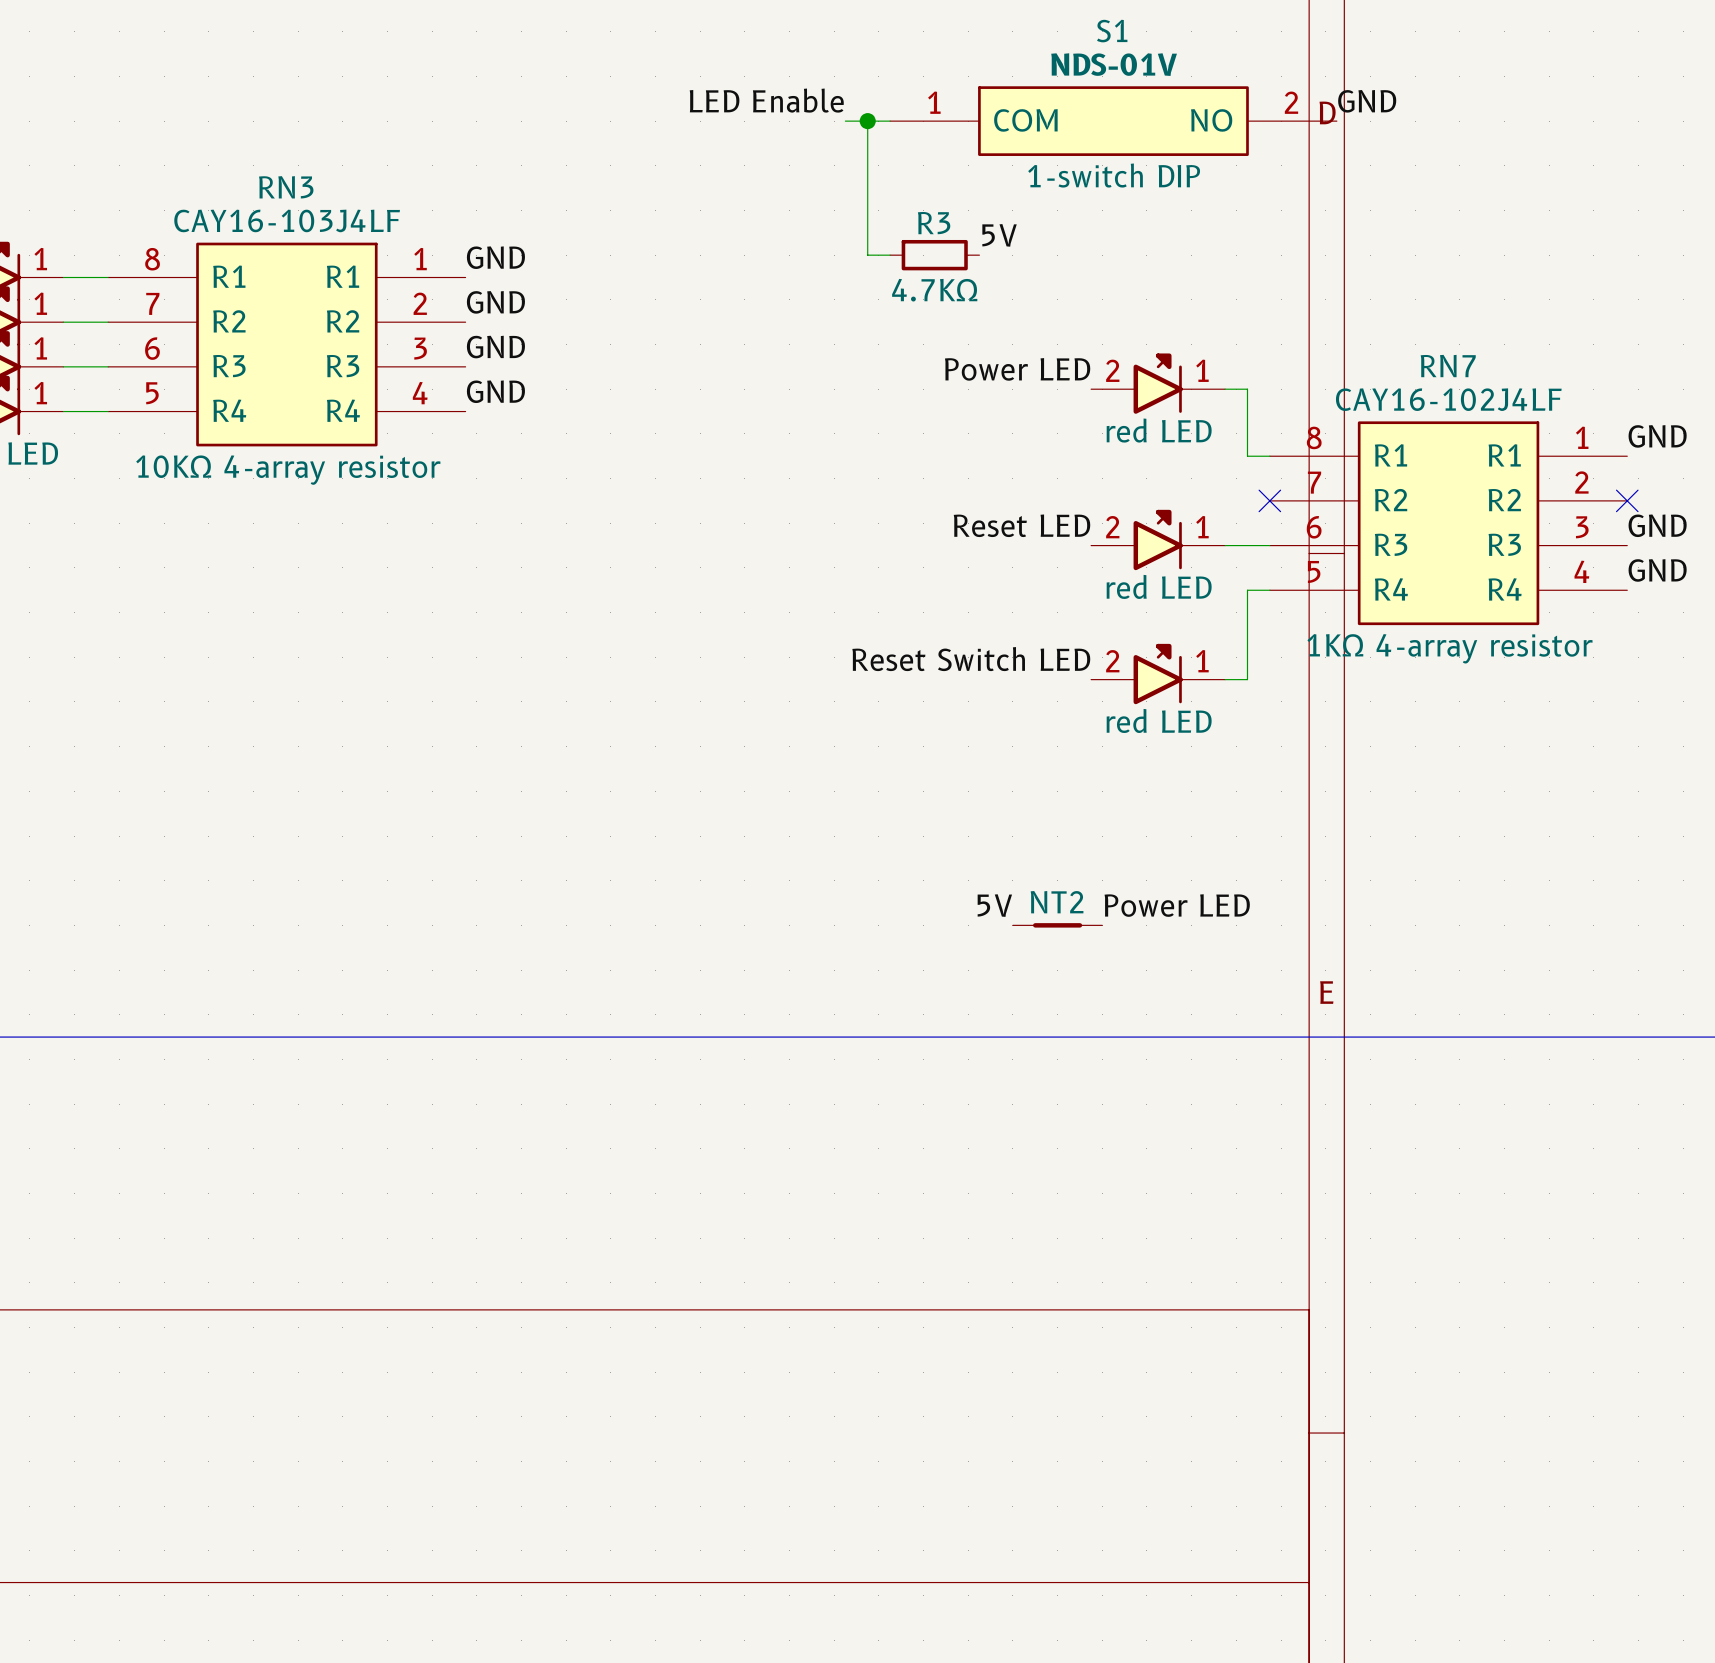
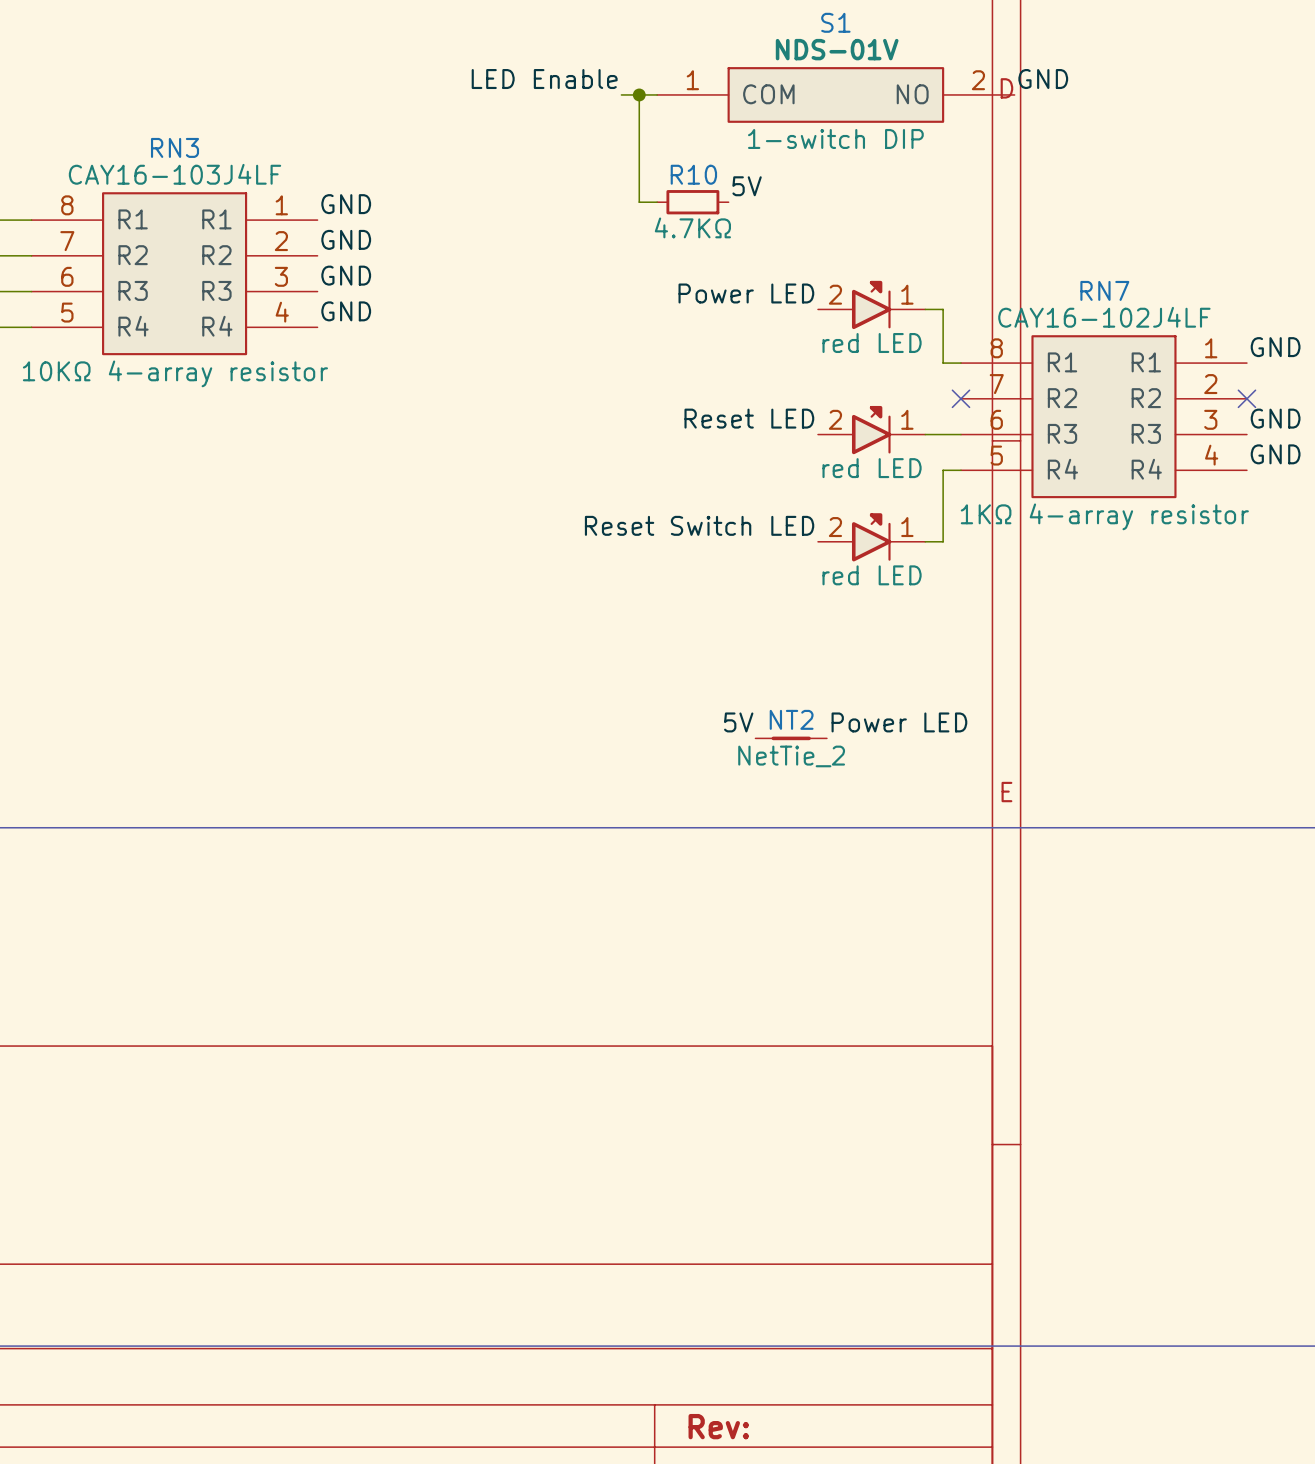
R3: (934, 255) -> none
R10: none -> (692, 202)
NT2 value: none -> NetTie_2 (791, 756)

